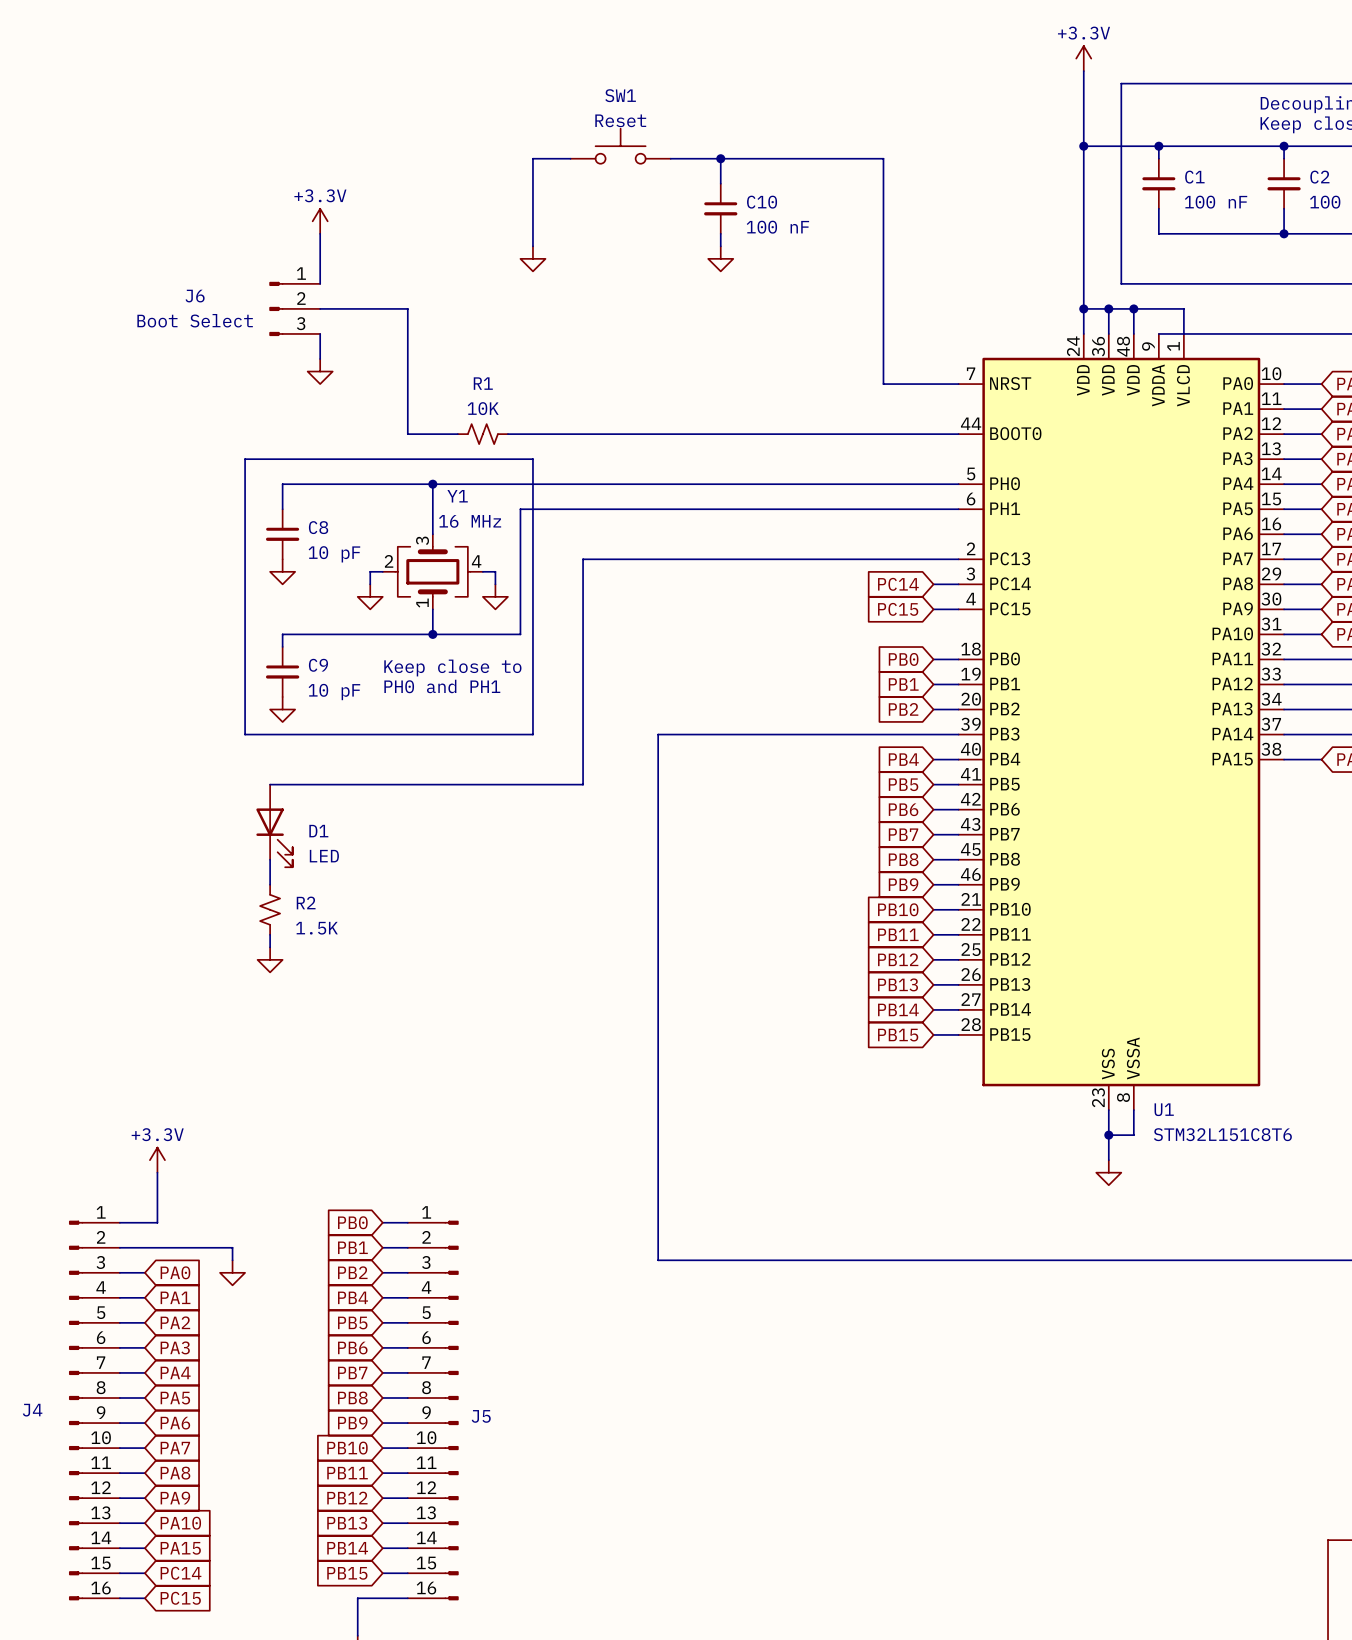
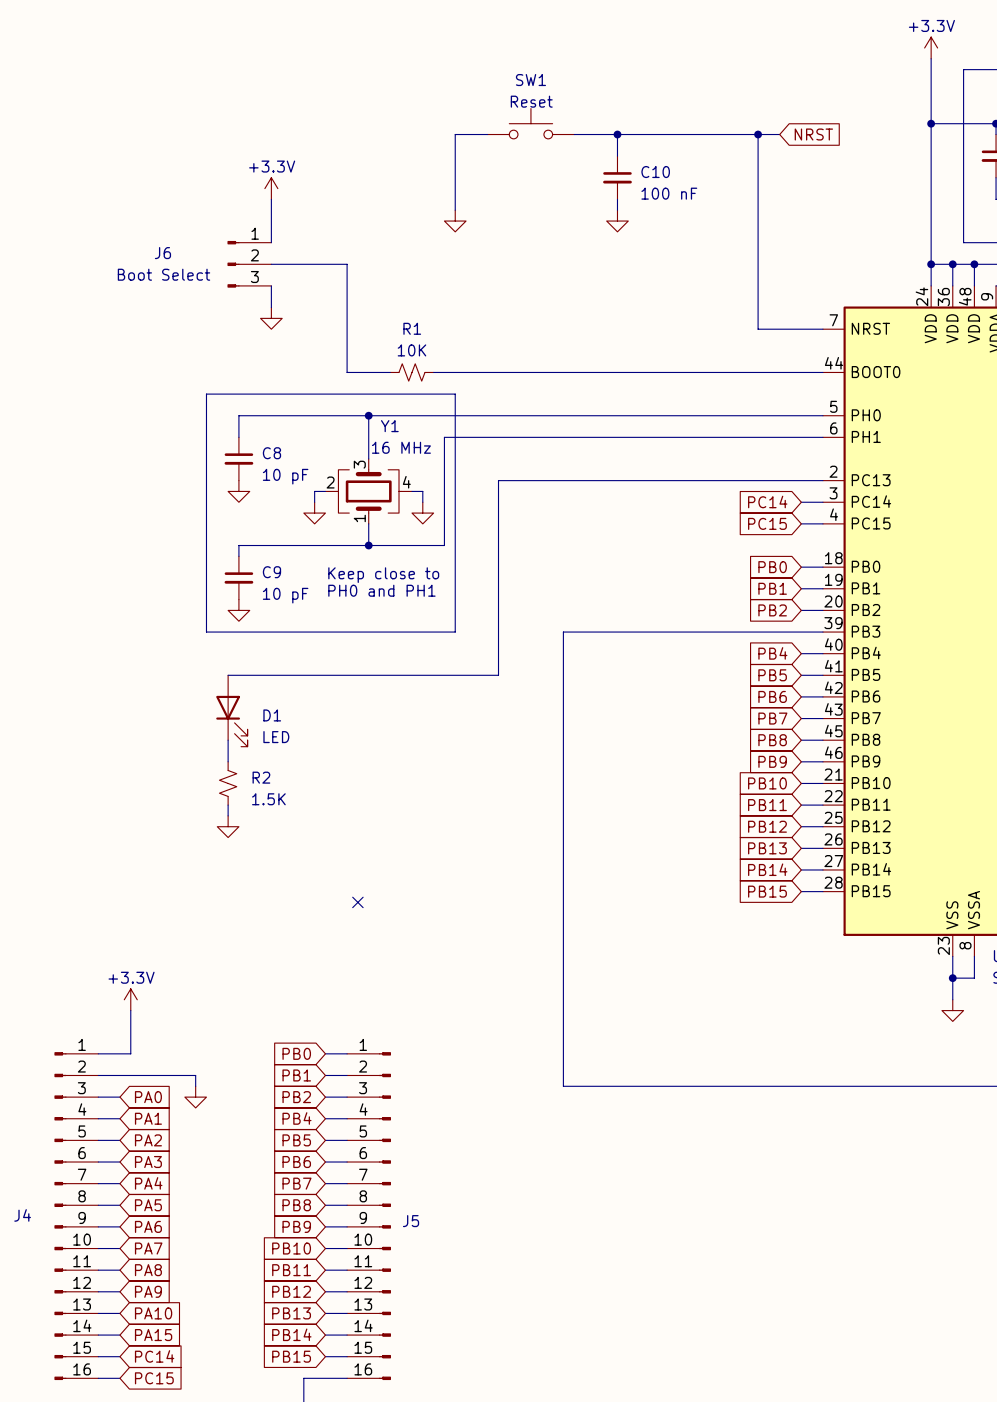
wire: none -> (758, 134) (779, 134)
junction: none -> (758, 134)
global label: none -> NRST (813, 134)
no-connect mark: none -> (357, 902)

